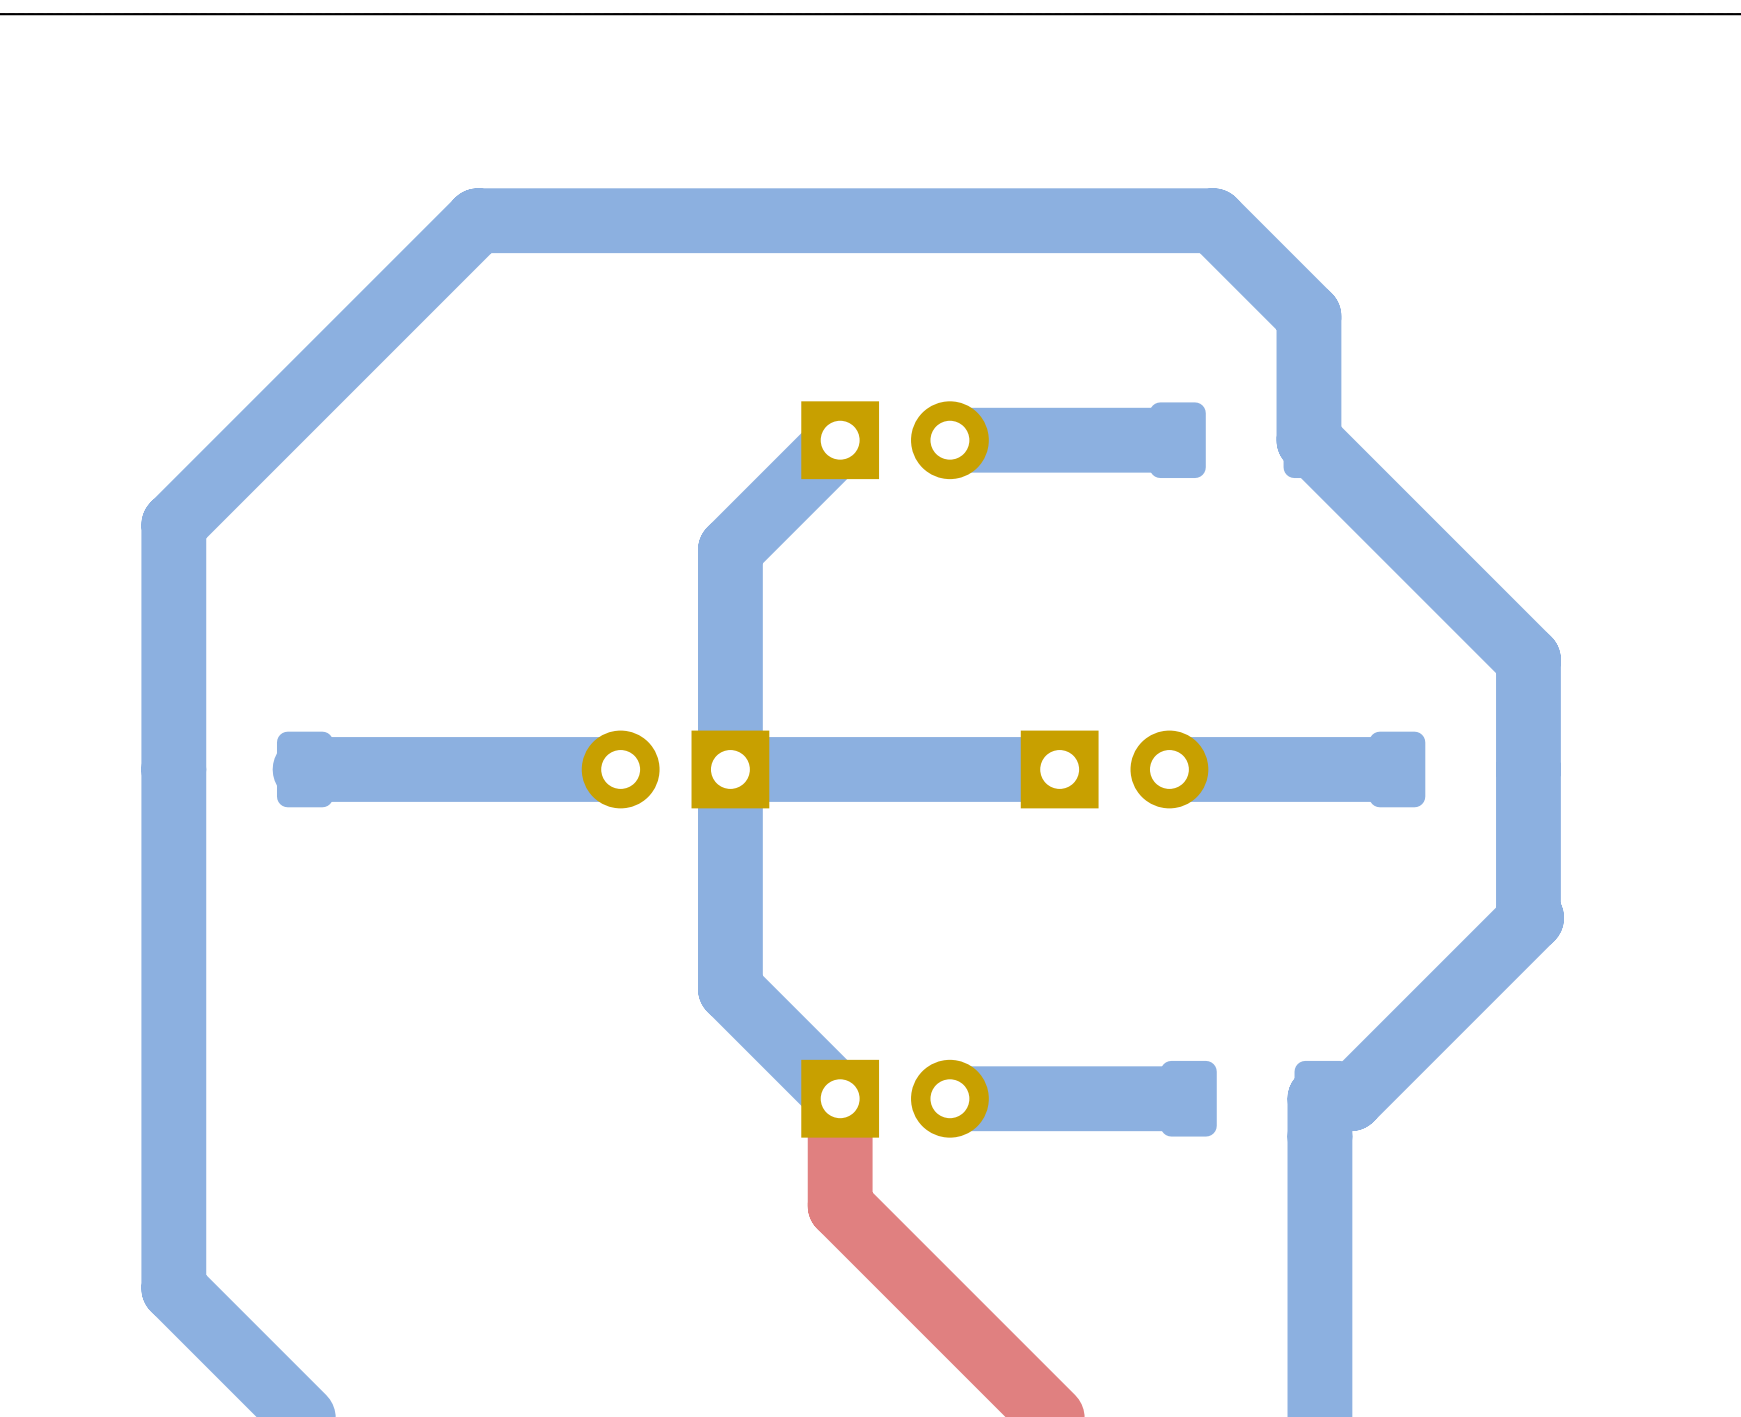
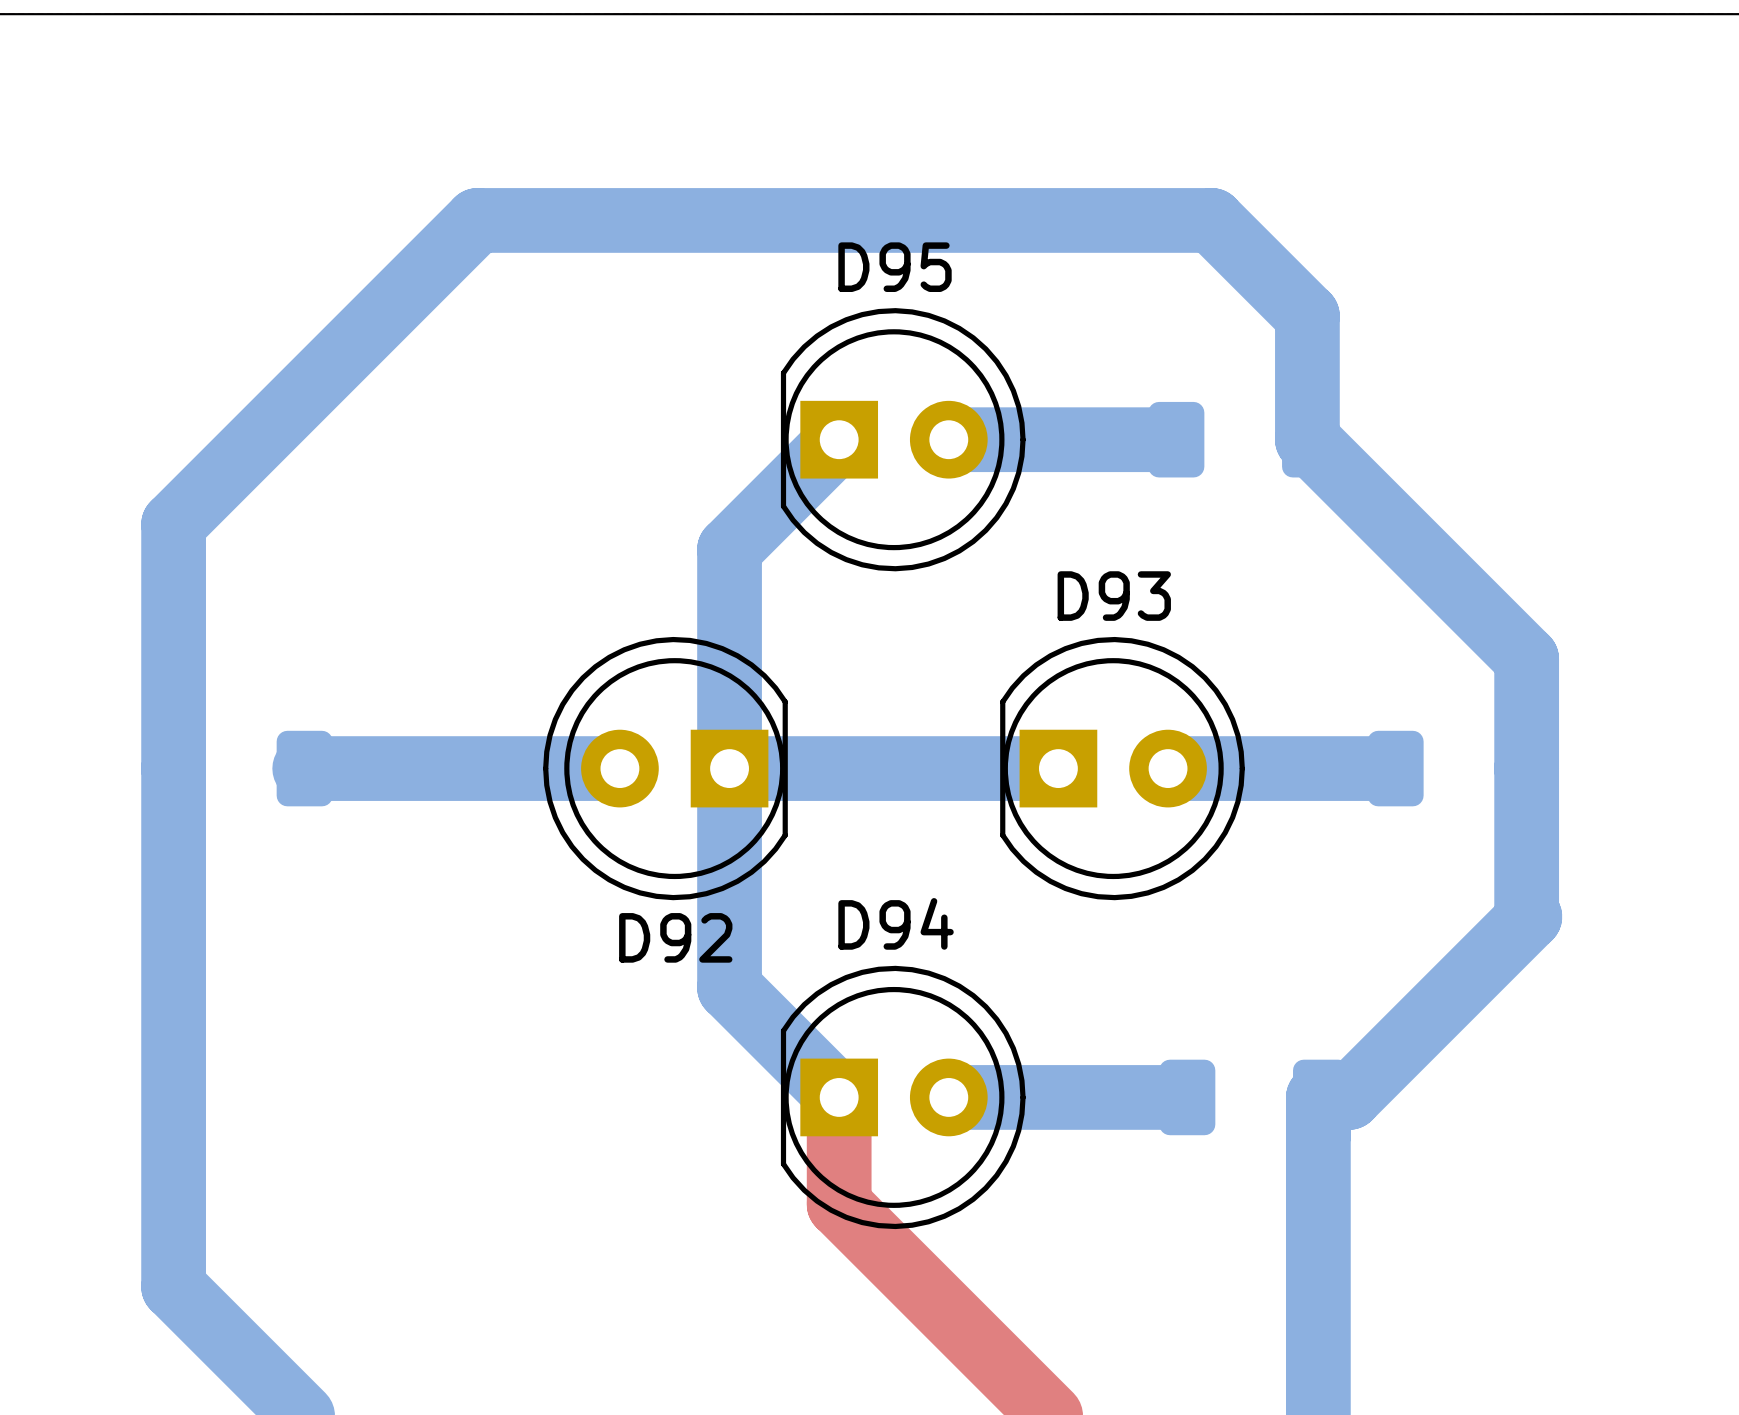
D95: none -> (903, 439)
D92: none -> (665, 768)
D93: none -> (1122, 768)
D94: none -> (903, 1097)

